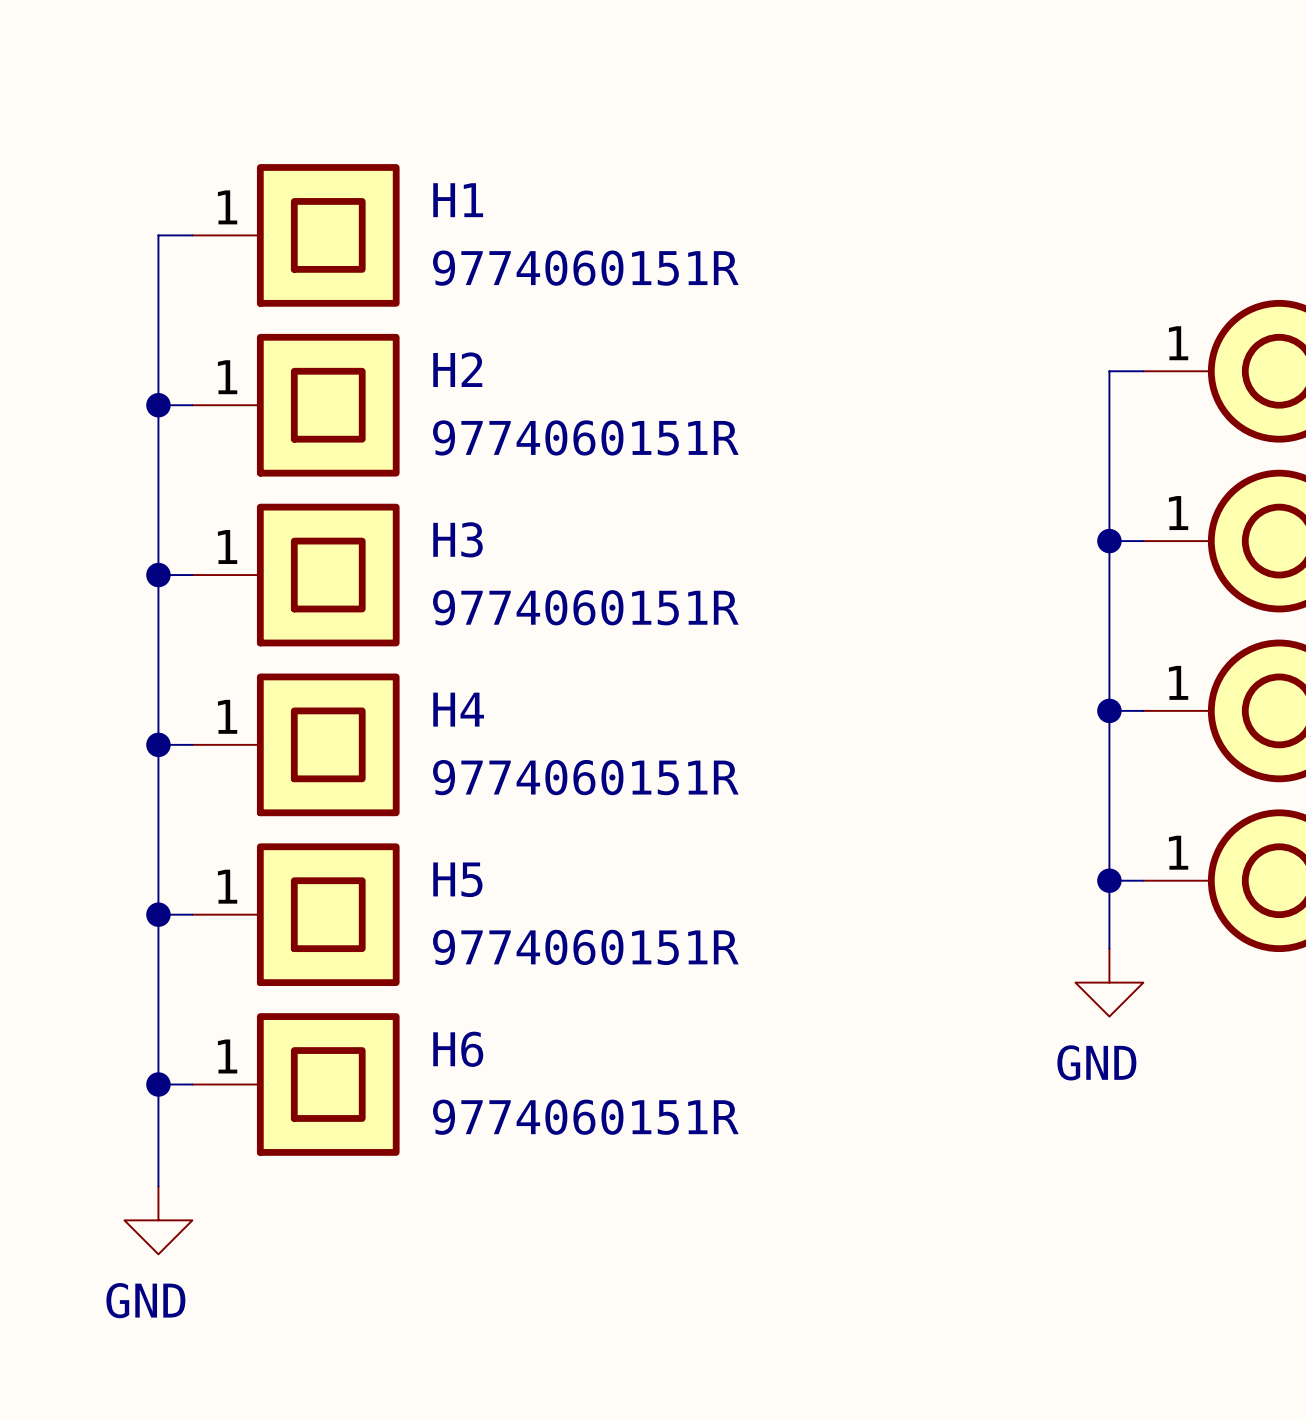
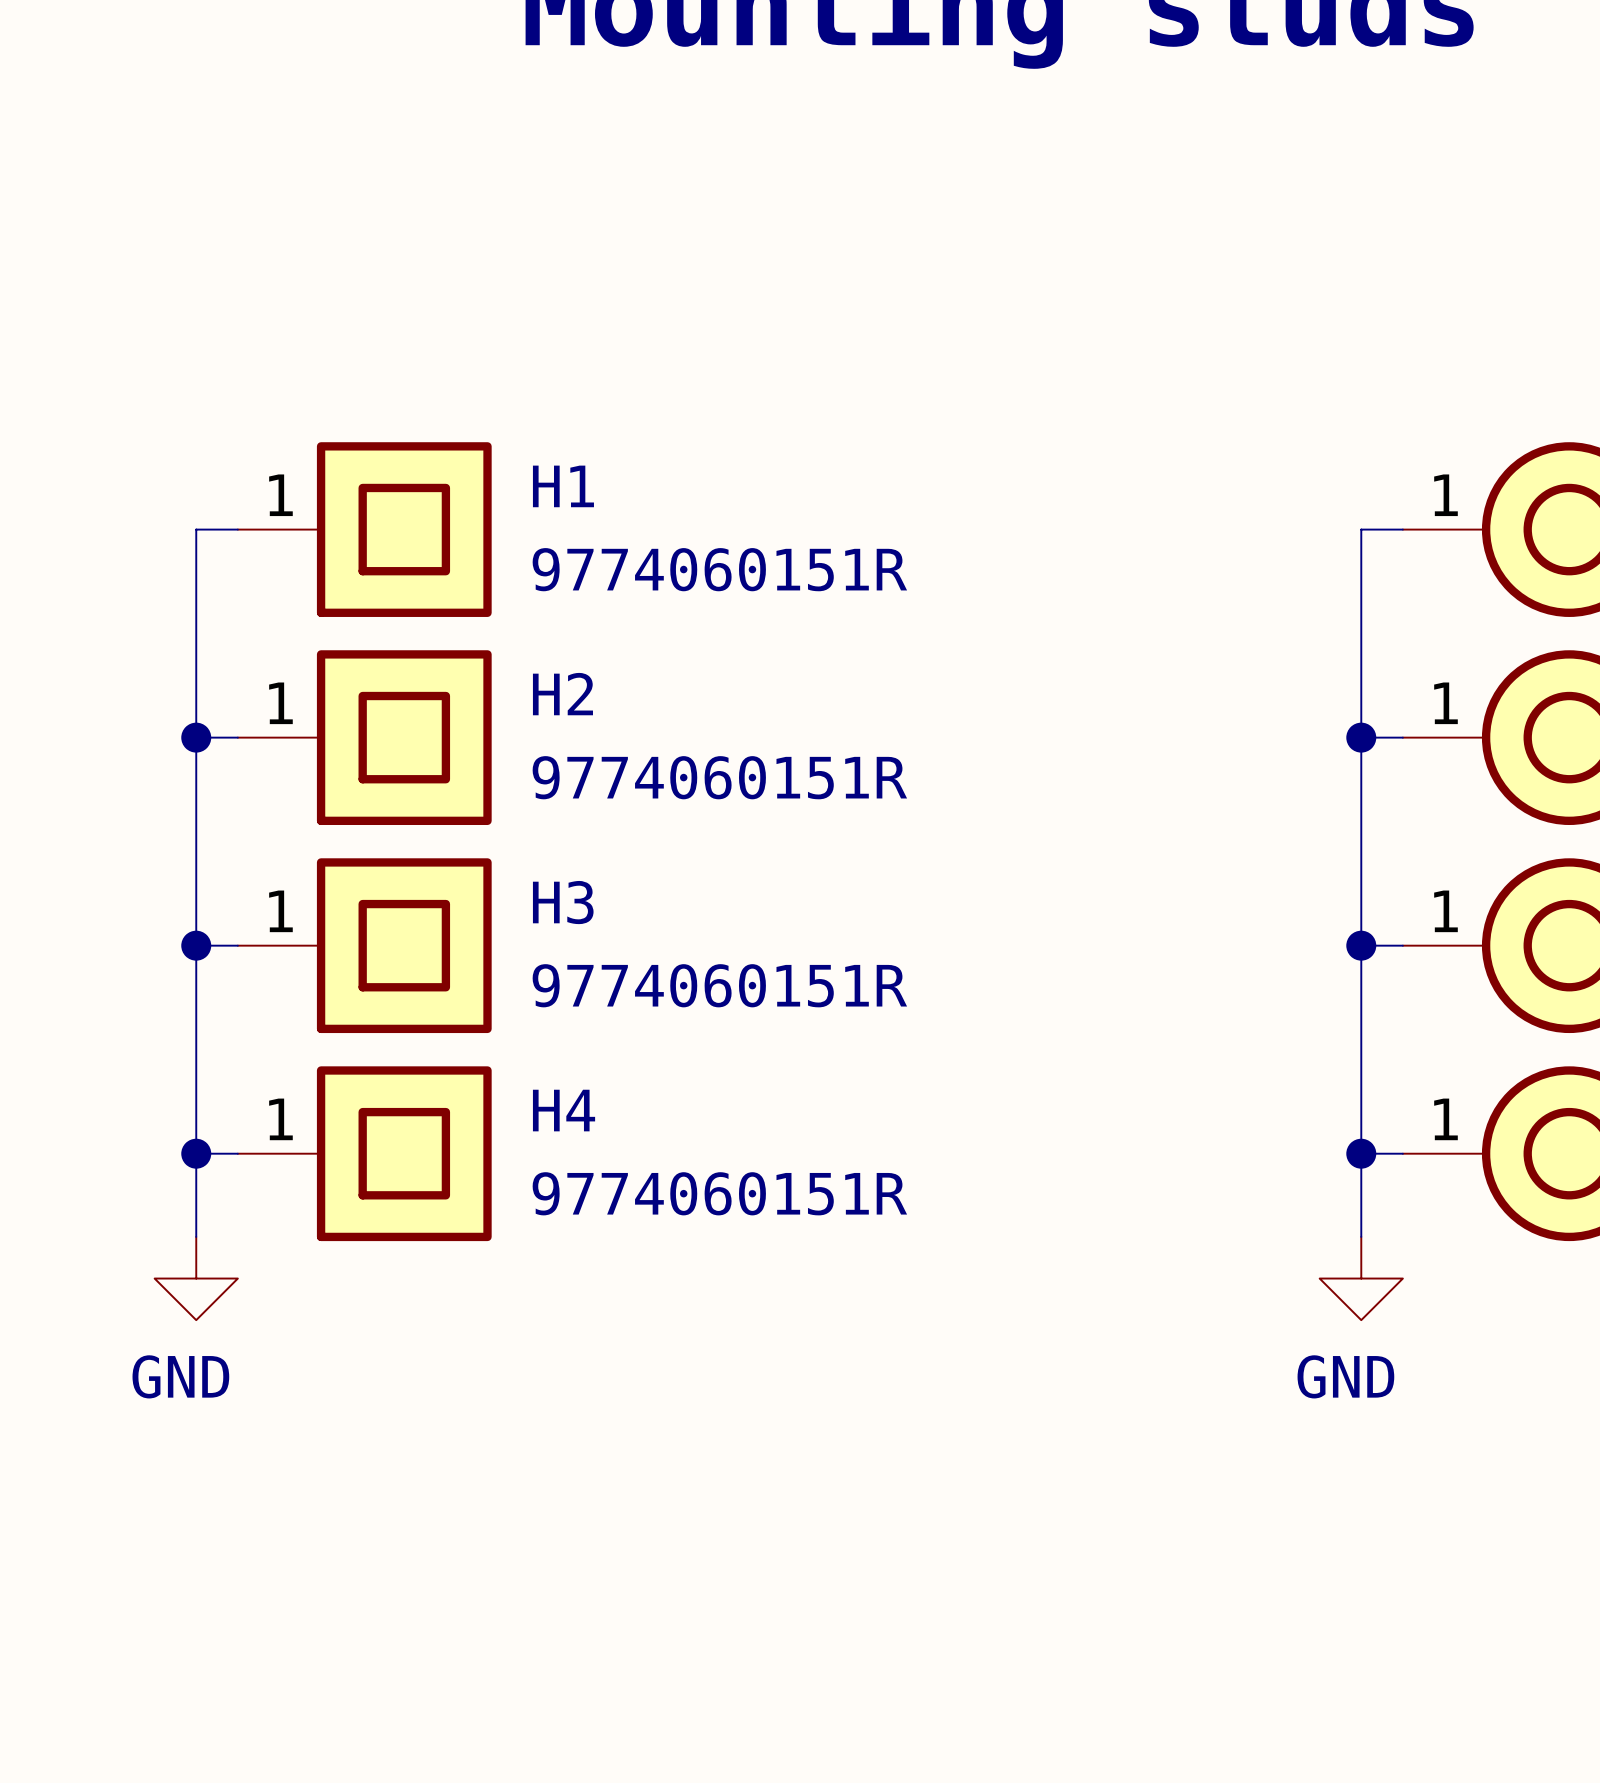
wire: (192, 235) (158, 235) (158, 371) -> (237, 529) (196, 529)
H1 position: (295, 235) -> (364, 529)
wire: (158, 405) (192, 405) -> none
junction: (158, 405) -> none
H2 position: (295, 405) -> (364, 737)
wire: (158, 575) (192, 575) -> (196, 737) (237, 737)
junction position: (158, 575) -> (196, 737)
H3 position: (295, 575) -> (364, 945)
wire: (158, 744) (192, 744) -> (196, 945) (237, 945)
junction position: (158, 744) -> (196, 945)
H4 position: (295, 744) -> (364, 1153)
wire: (158, 914) (192, 914) -> (196, 1153) (237, 1153)
junction position: (158, 914) -> (196, 1153)
H5: (295, 914) -> none
wire: (158, 948) (158, 1186) -> none
wire: (158, 1084) (192, 1084) -> none
junction: (158, 1084) -> none
H6: (295, 1084) -> none
power symbol position: GND (158, 1220) -> GND (196, 1278)

